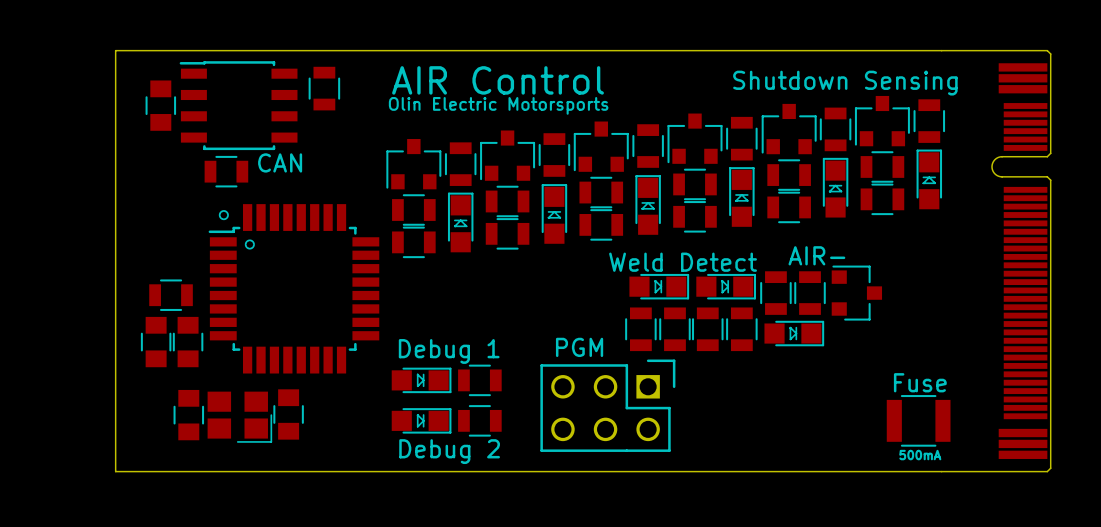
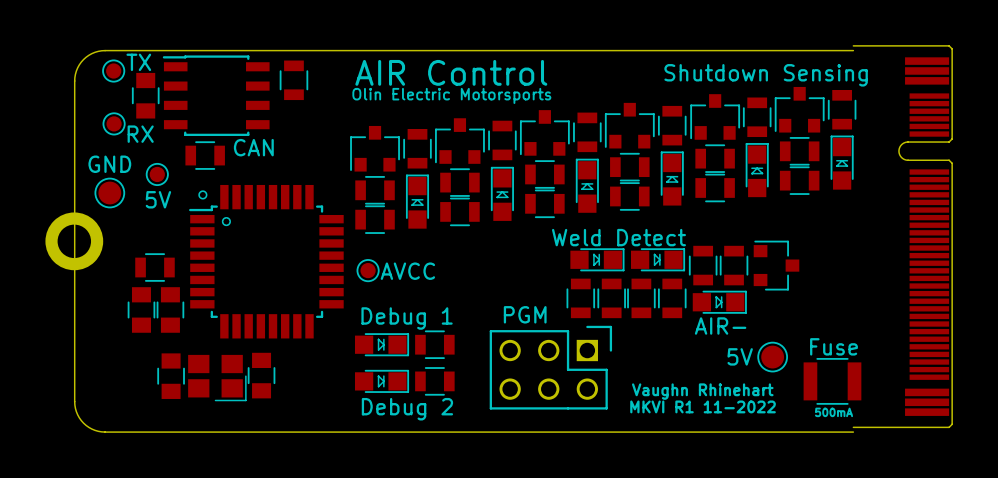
board edge: (941, 50) (115, 50) (115, 471) (941, 471) -> none
board edge: none -> (853, 50) (105, 50) (95, 52) (83, 59) (77, 67) (74, 81) (74, 401) (79, 417) (91, 429) (105, 432) (853, 432)
text: none -> TX (138, 62)
part: none -> (113, 71)
part: none -> (114, 123)
text: none -> RX (140, 134)
text: none -> GND (109, 164)
part: none -> (157, 174)
part: none -> (109, 193)
text: none -> 5V (158, 199)
text position: AIR- (816, 255) -> AIR- (720, 326)
part: none -> (74, 241)
part: none -> (368, 270)
text: none -> AVCC (407, 271)
text: none -> 5V (740, 356)
part: none -> (772, 357)
text: none -> Vaughn Rhinehart (702, 391)
text: none -> MKVI R1 11-2022 (703, 406)

